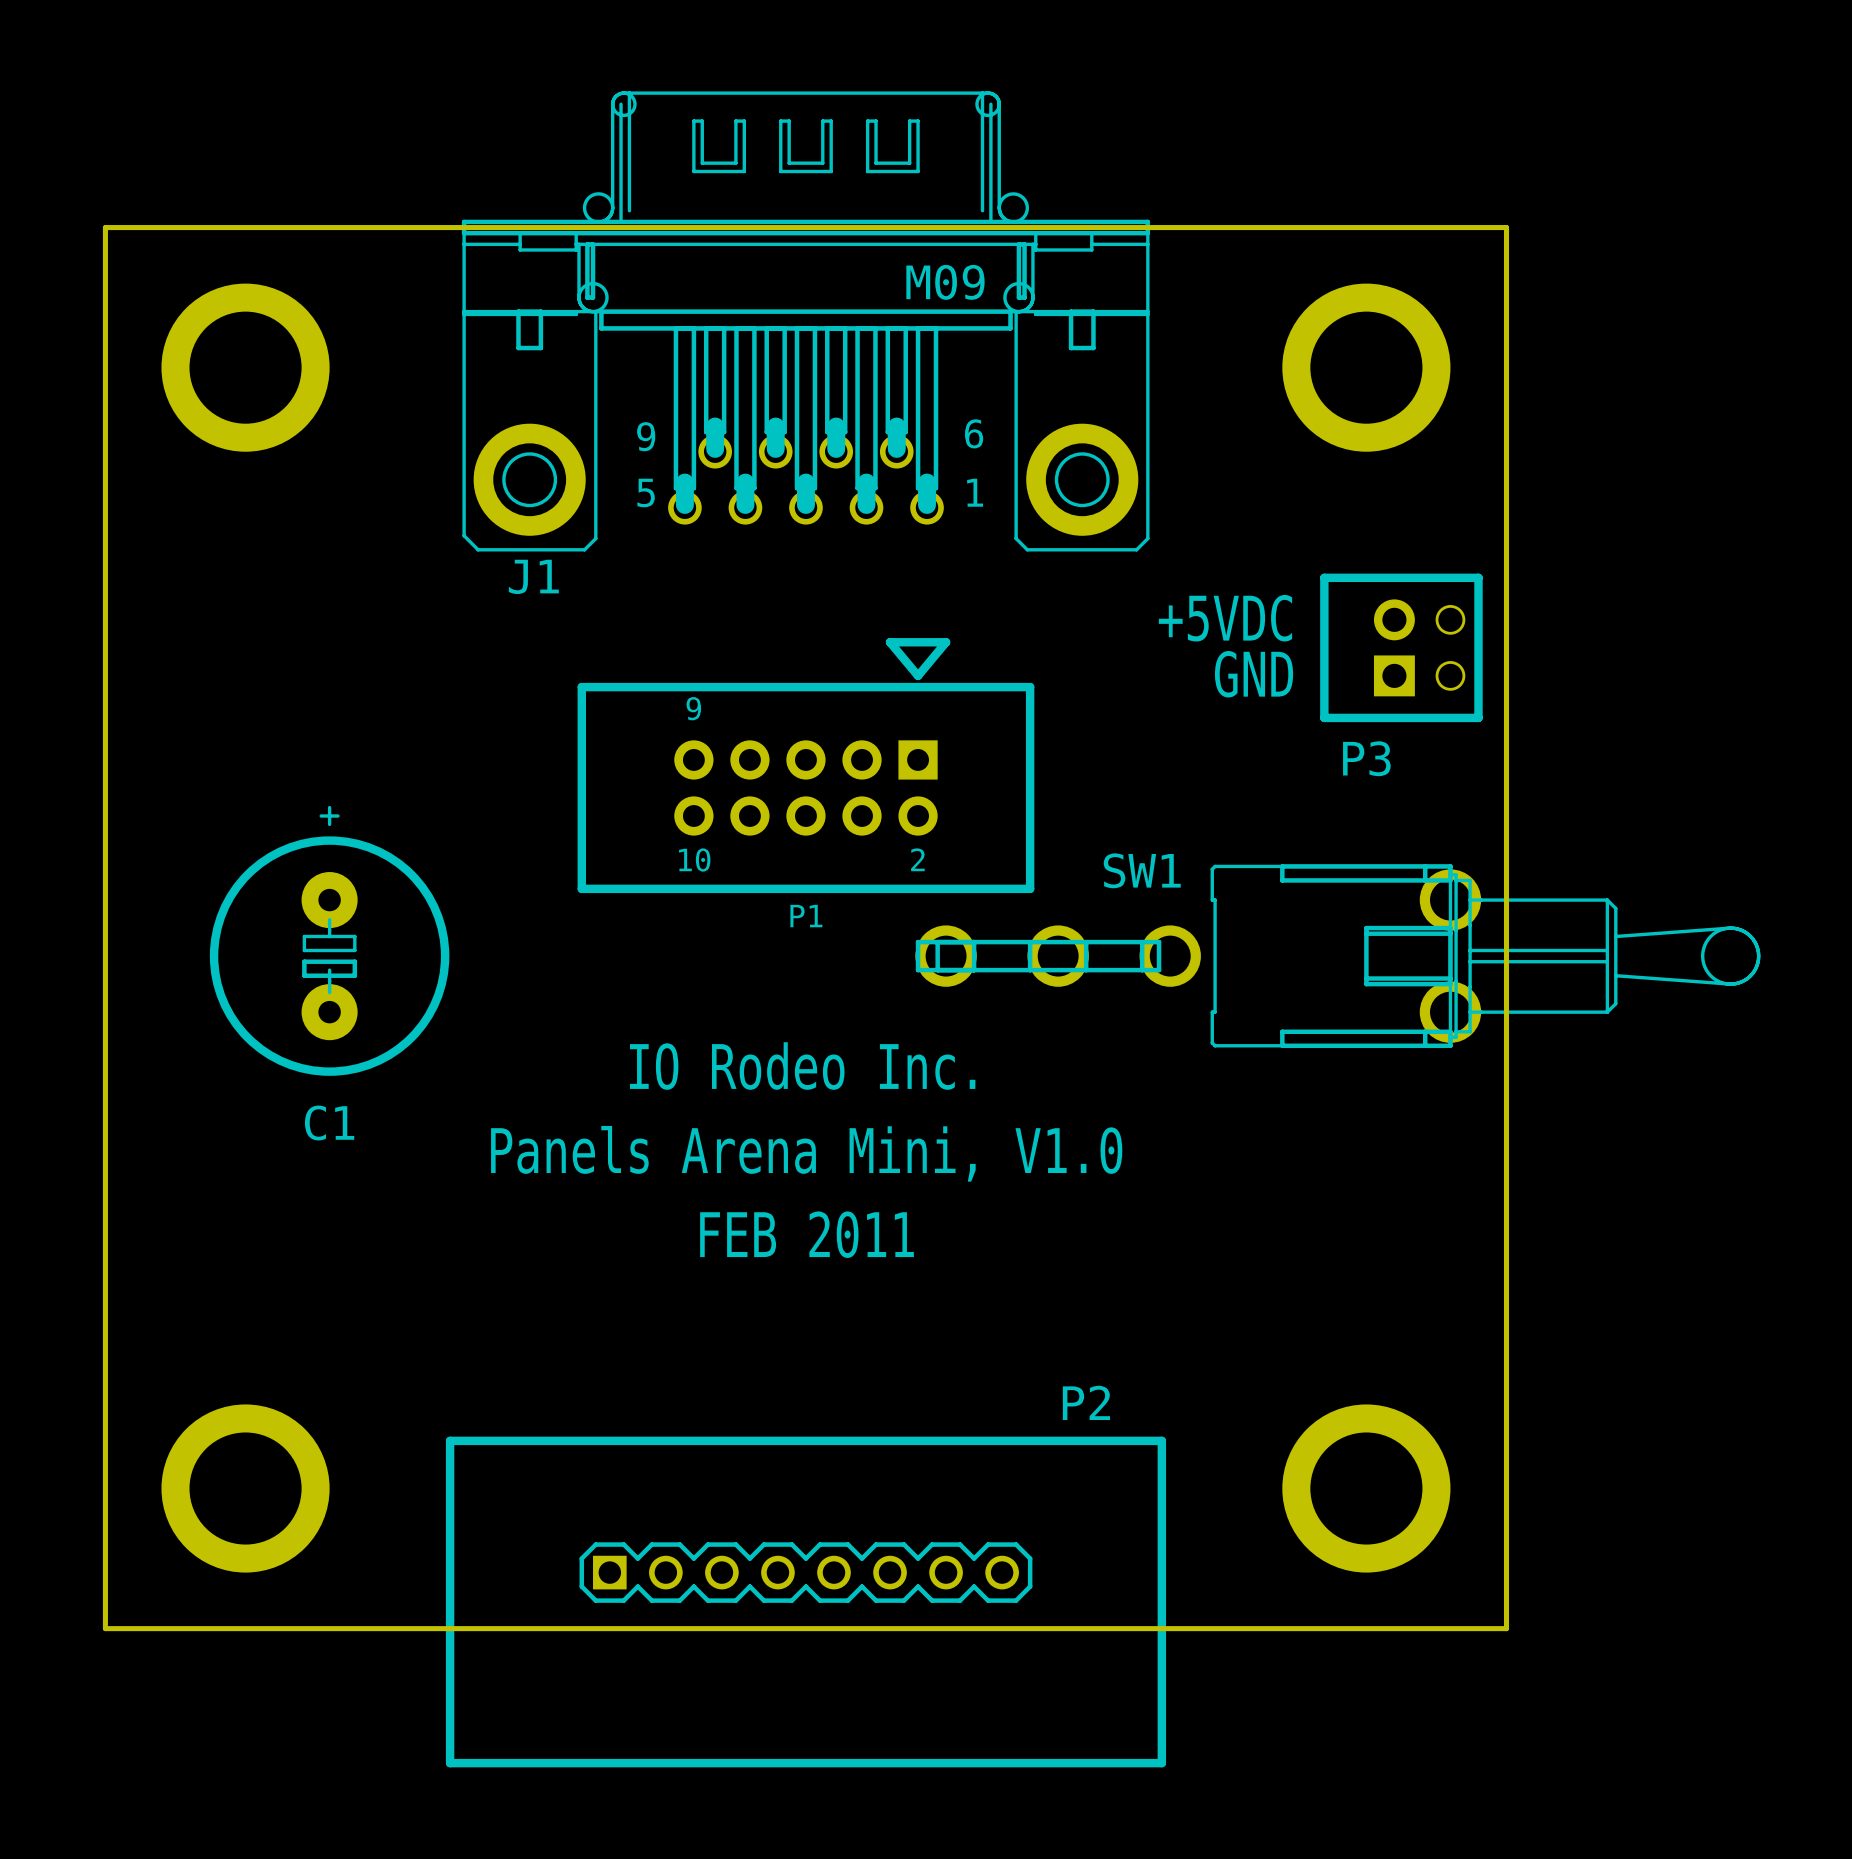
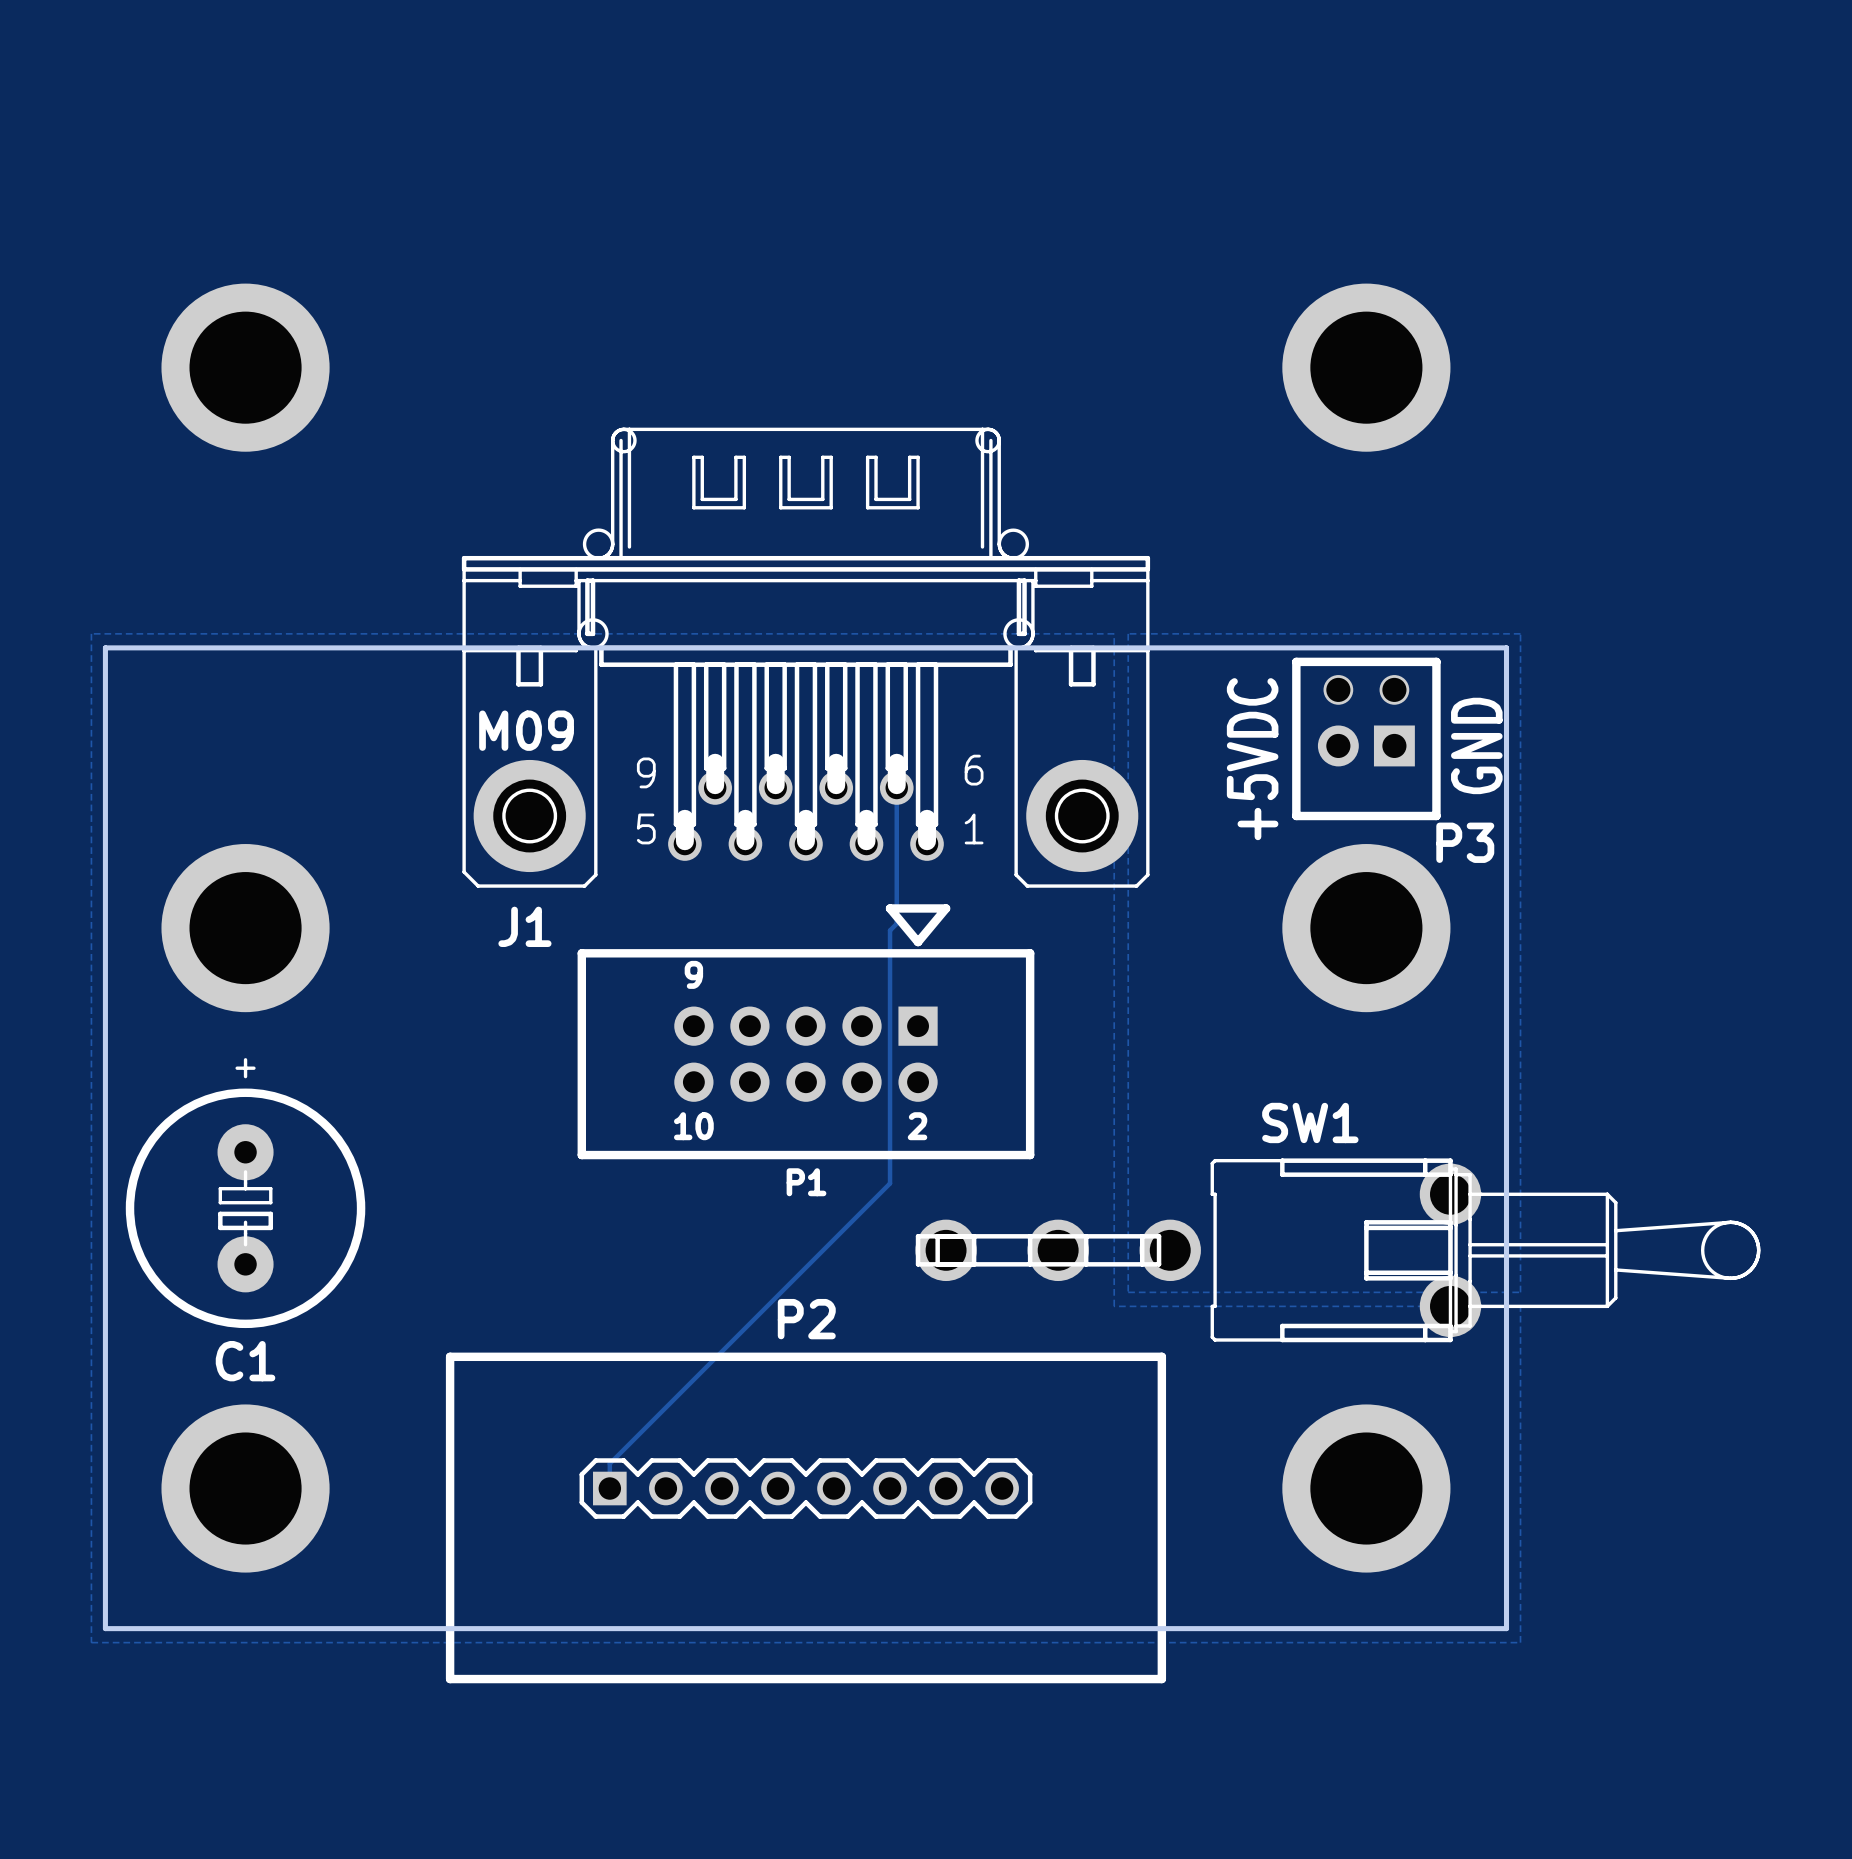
J1 text position: M09 (945, 282) -> M09 (526, 730)
J1 position: (805, 321) -> (805, 657)
J1 name position: J1 (533, 576) -> J1 (524, 926)
text rotation: 0° (1225, 618) -> 90° counterclockwise (1252, 759)
zone outline: none -> (91, 633) (1114, 633) (1114, 1306) (1520, 1306) (1520, 1642) (91, 1642) (91, 633)
zone outline: none -> (1128, 633) (1520, 633) (1520, 1292) (1128, 1292) (1128, 633)
board edge: (105, 647) (105, 227) (1506, 227) (1506, 647) -> (105, 647) (1506, 647)
P3 rotation: 0° (1401, 647) -> 90° counterclockwise (1366, 738)
P3 position: (1401, 647) -> (1366, 738)
text rotation: 0° (1254, 674) -> 90° counterclockwise (1476, 745)
text position: GND (1254, 674) -> GND (1476, 745)
P3 name position: P3 (1366, 758) -> P3 (1465, 842)
P1 position: (805, 765) -> (805, 1031)
track: none -> (896, 787) (896, 923) (890, 930) (890, 1183) (609, 1463) (609, 1488)
SW1 name position: SW1 (1142, 870) -> SW1 (1310, 1122)
part: none -> (245, 928)
part: none -> (1366, 928)
C1 position: (329, 940) -> (245, 1193)
SW1 position: (1337, 956) -> (1337, 1250)
text: IO Rodeo Inc. (802, 1066) -> none
C1 name position: C1 (329, 1123) -> C1 (245, 1361)
text: Panels Arena Mini, V1.0 (806, 1153) -> none
text: FEB 2011 (807, 1234) -> none
P2 name position: P2 (1086, 1402) -> P2 (806, 1319)
P2 position: (805, 1602) -> (805, 1517)

